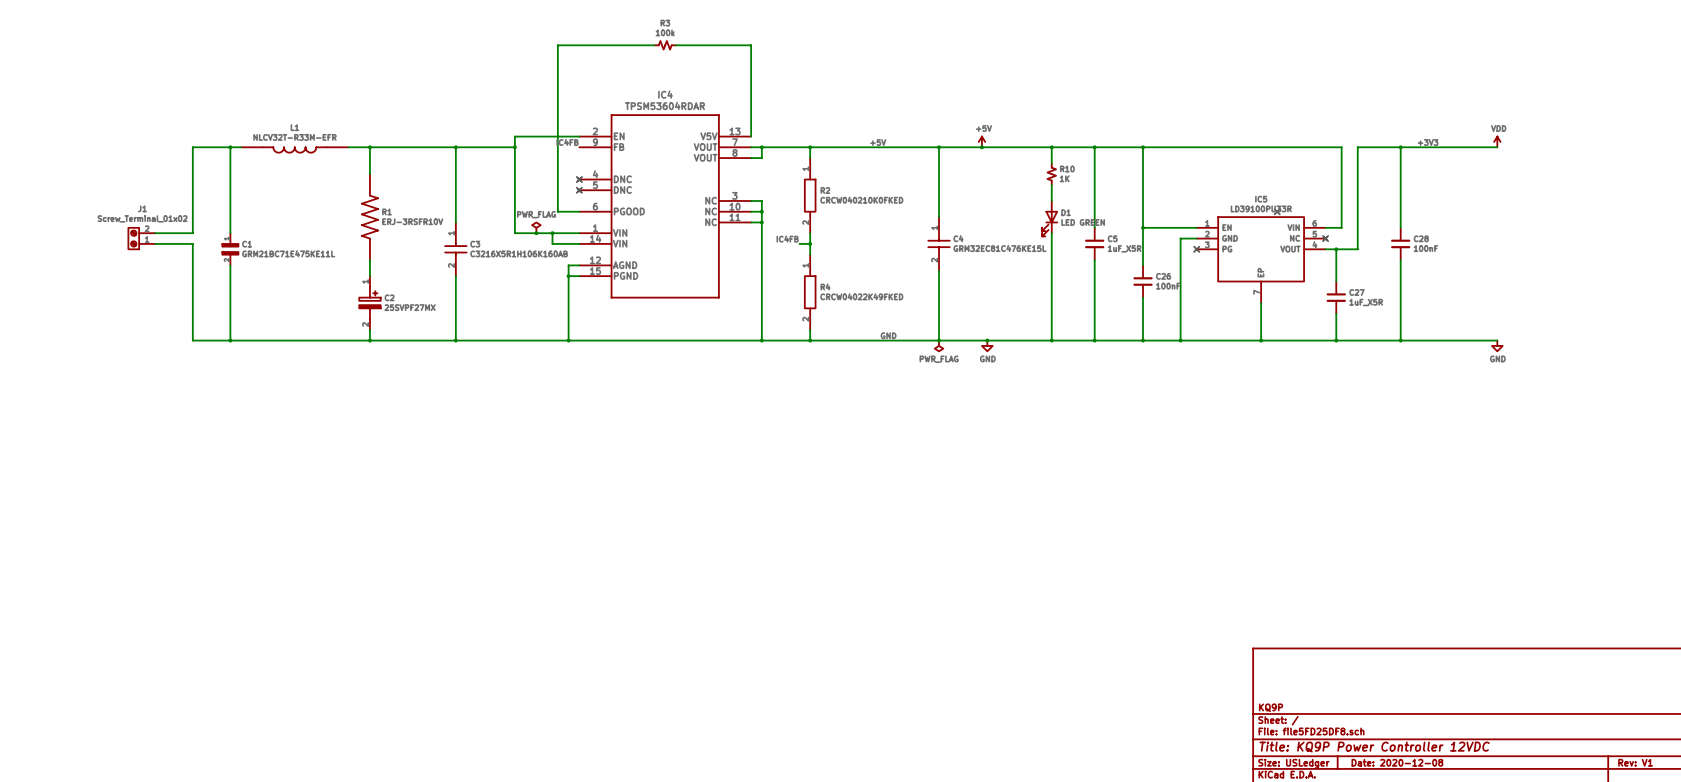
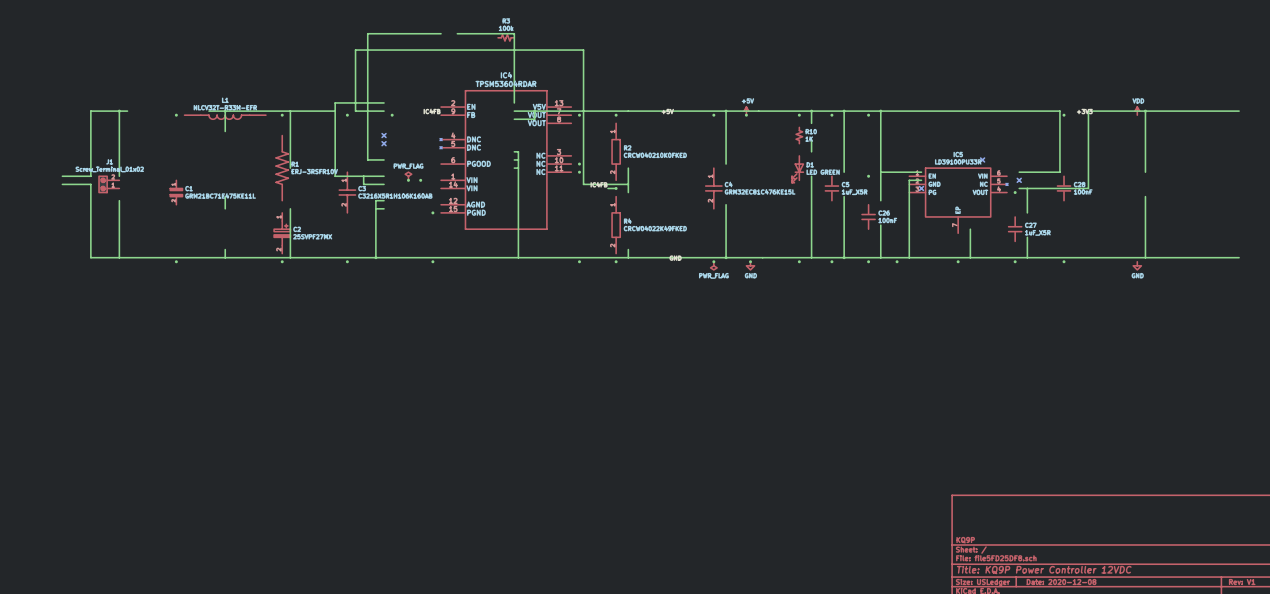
wire: (654, 45) (557, 45) (557, 211) (579, 211) -> (441, 33) (367, 33) (367, 159) (384, 159)
wire: (675, 45) (751, 45) (751, 136) -> (457, 33) (514, 33) (514, 102)
wire: (579, 136) (514, 136) (514, 233) (579, 233) -> (384, 102) (335, 102) (335, 176) (384, 176)
wire: none -> (384, 111) (355, 111) (355, 50) (583, 50) (583, 184) (628, 184)
wire: none -> (514, 111) (1059, 111) (1059, 172) (1019, 172)
wire: none -> (534, 111) (534, 119) (514, 119)
wire: none -> (1145, 111) (1145, 172)
wire: none -> (1239, 111) (1088, 111) (1088, 188) (1019, 188)
wire: (230, 147) (230, 233) -> (119, 111) (119, 176)
wire: (241, 147) (192, 147) (192, 233) (155, 233) -> (127, 111) (90, 111) (90, 176) (62, 176)
wire: (348, 147) (514, 147) -> (208, 111) (335, 111)
wire: (369, 147) (369, 174) -> (225, 111) (225, 131)
wire: (455, 147) (455, 222) -> (290, 111) (290, 168)
wire: (751, 147) (1341, 147) (1341, 227) (1325, 227) -> none
wire: (761, 147) (761, 158) (751, 158) -> none
wire: (810, 147) (810, 158) -> none
wire: (939, 147) (939, 217) -> (726, 111) (726, 164)
wire: (1051, 147) (1051, 163) -> (811, 111) (811, 123)
wire: (1094, 147) (1094, 227) -> (844, 111) (844, 172)
wire: (1143, 147) (1143, 265) -> (880, 111) (880, 200)
wire: (1400, 147) (1400, 227) -> none
wire: (1497, 147) (1357, 147) (1357, 249) (1325, 249) -> none
no-connect mark: none -> (384, 135)
no-connect mark: (579, 179) -> none
no-connect mark: none -> (384, 143)
wire: (1051, 184) (1051, 200) -> (811, 139) (811, 151)
no-connect mark: (579, 190) -> none
wire: none -> (514, 151) (518, 151) (518, 257)
wire: (751, 200) (761, 200) (761, 340) -> none
wire: none -> (514, 159) (518, 159)
wire: (751, 211) (761, 211) -> none
no-connect mark position: (1277, 211) -> (982, 159)
wire: none -> (514, 168) (518, 168)
wire: none -> (628, 168) (628, 192)
wire: (751, 222) (761, 222) -> none
wire: (1143, 227) (1196, 227) -> (880, 172) (921, 172)
wire: (552, 233) (552, 243) (579, 243) -> (363, 176) (363, 184) (384, 184)
wire: (810, 233) (810, 254) -> none
wire: (1051, 233) (1051, 340) -> (811, 176) (811, 257)
wire: none -> (62, 184) (90, 184) (90, 257) (1239, 257)
wire: (1196, 238) (1180, 238) (1180, 340) -> (921, 180) (909, 180) (909, 257)
no-connect mark position: (1325, 238) -> (1019, 180)
wire: (155, 243) (192, 243) (192, 340) (1497, 340) -> none
no-connect mark position: (1196, 249) -> (921, 188)
wire: (1336, 249) (1336, 281) -> (1027, 188) (1027, 212)
wire: none -> (1145, 196) (1145, 257)
wire: (369, 260) (369, 276) -> (225, 196) (225, 208)
wire: (1094, 260) (1094, 340) -> (844, 196) (844, 257)
wire: (1400, 260) (1400, 340) -> none
wire: (230, 265) (230, 340) -> (119, 200) (119, 257)
wire: (579, 265) (568, 265) (568, 340) -> (384, 200) (375, 200) (375, 257)
wire: (939, 270) (939, 340) -> (726, 204) (726, 257)
wire: (455, 276) (455, 340) -> (290, 208) (290, 257)
wire: (568, 276) (579, 276) -> (375, 208) (384, 208)
wire: (1143, 297) (1143, 340) -> (880, 225) (880, 257)
wire: (1261, 302) (1261, 340) -> (970, 229) (970, 257)
wire: (1336, 313) (1336, 340) -> (1027, 237) (1027, 257)
wire: (369, 329) (369, 340) -> (225, 249) (225, 257)
wire: (810, 329) (810, 340) -> (628, 249) (628, 257)

